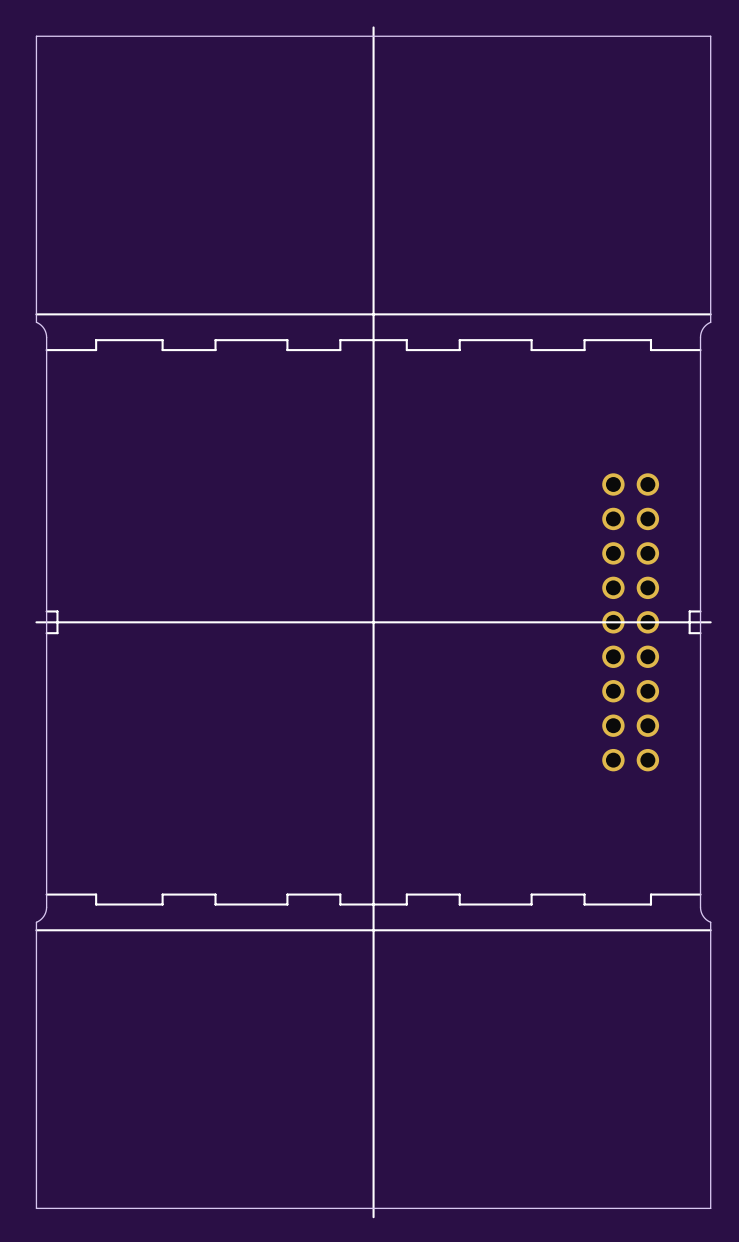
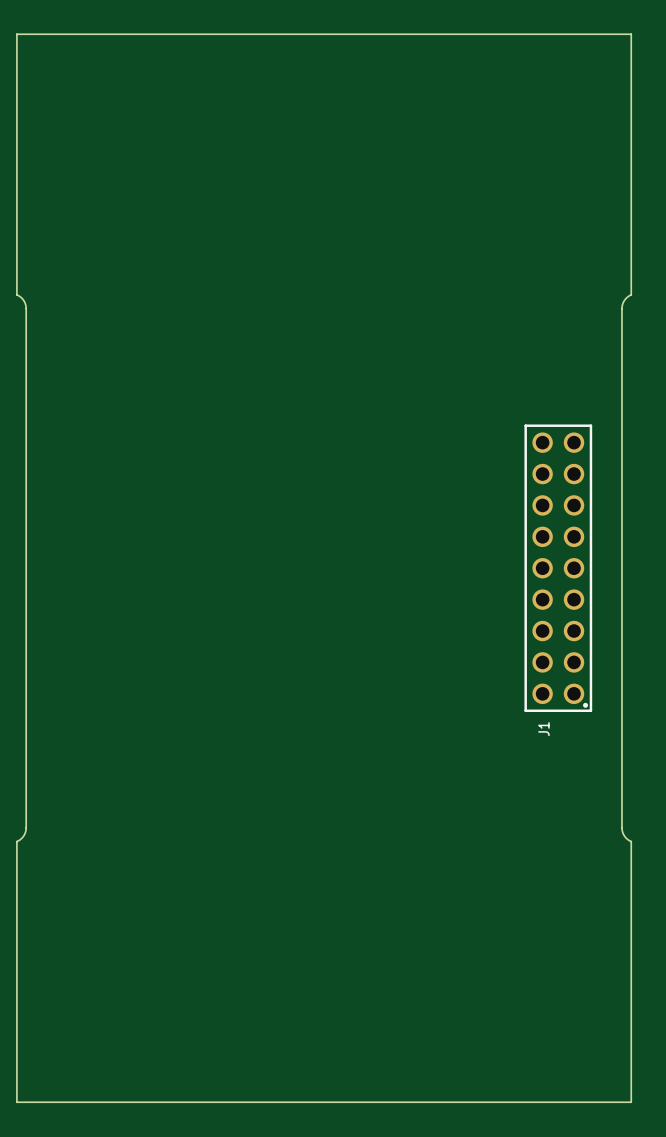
line: (373, 27) (373, 1217) -> none
line: (36, 314) (710, 314) -> none
line: (46, 350) (96, 350) (96, 340) (162, 340) (162, 350) (215, 350) (215, 340) (287, 340) (287, 350) (340, 350) (340, 340) (406, 340) (406, 350) (459, 350) (459, 340) (531, 340) (531, 350) (584, 350) (584, 340) (650, 340) (650, 350) (700, 350) -> none
line: (46, 611) (57, 611) (57, 633) (46, 633) -> none
line: (700, 611) (689, 611) (689, 633) (700, 633) -> none
line: (36, 622) (710, 622) -> none
J1 side: bottom (630, 622) -> top (558, 568)
line: (46, 894) (96, 894) (96, 904) (162, 904) (162, 894) (215, 894) (215, 904) (287, 904) (287, 894) (340, 894) (340, 904) (406, 904) (406, 894) (459, 894) (459, 904) (531, 904) (531, 894) (584, 894) (584, 904) (650, 904) (650, 894) (700, 894) -> none
line: (36, 930) (710, 930) -> none

